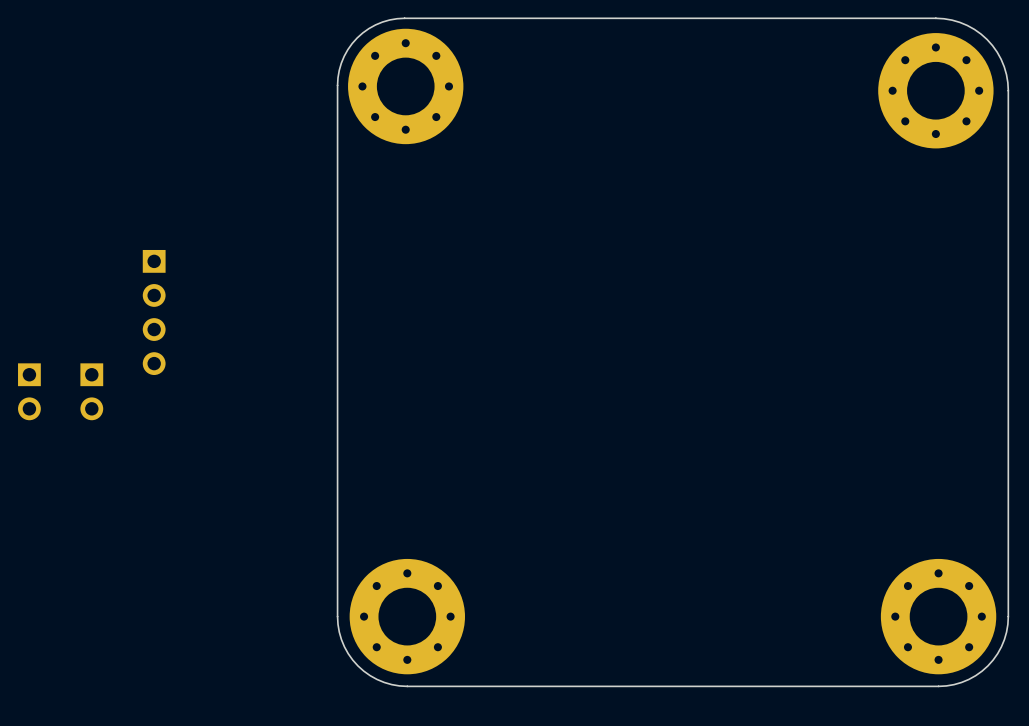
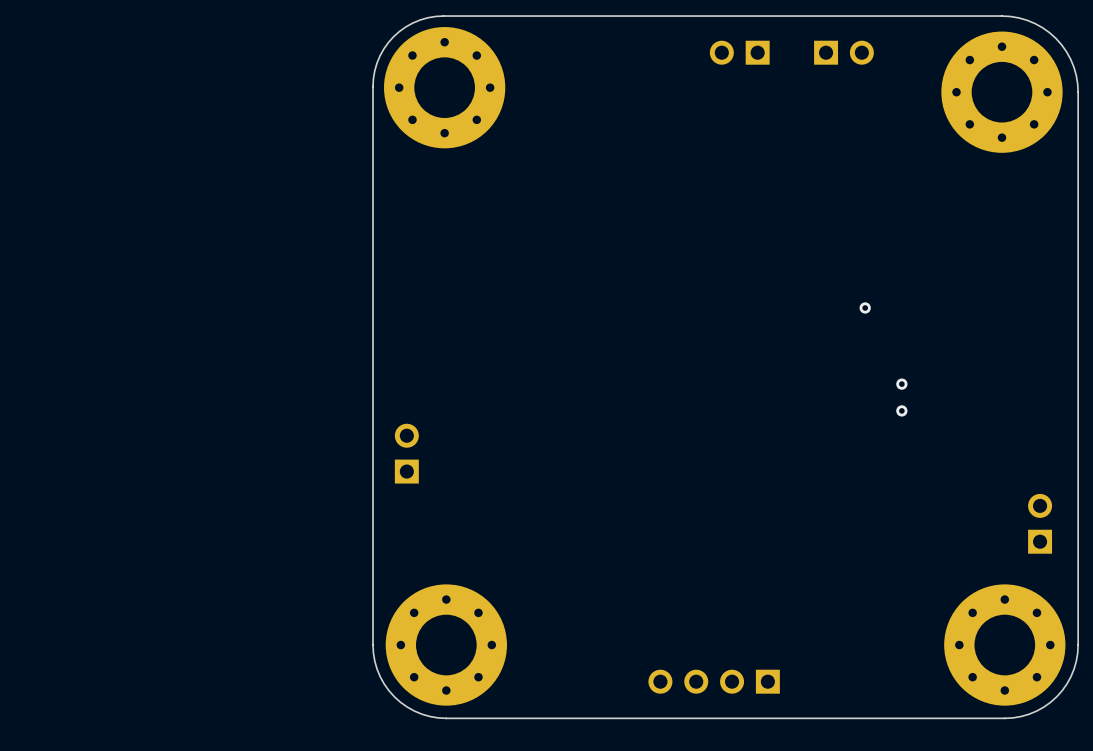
part: none -> (739, 52)
part: none -> (843, 52)
via: none -> (865, 307)
part: (154, 312) -> none
via: none -> (901, 384)
part: (29, 391) -> none
part: (91, 391) -> none
via: none -> (901, 410)
part: none -> (406, 453)
part: none -> (1040, 523)
part: none -> (714, 681)

